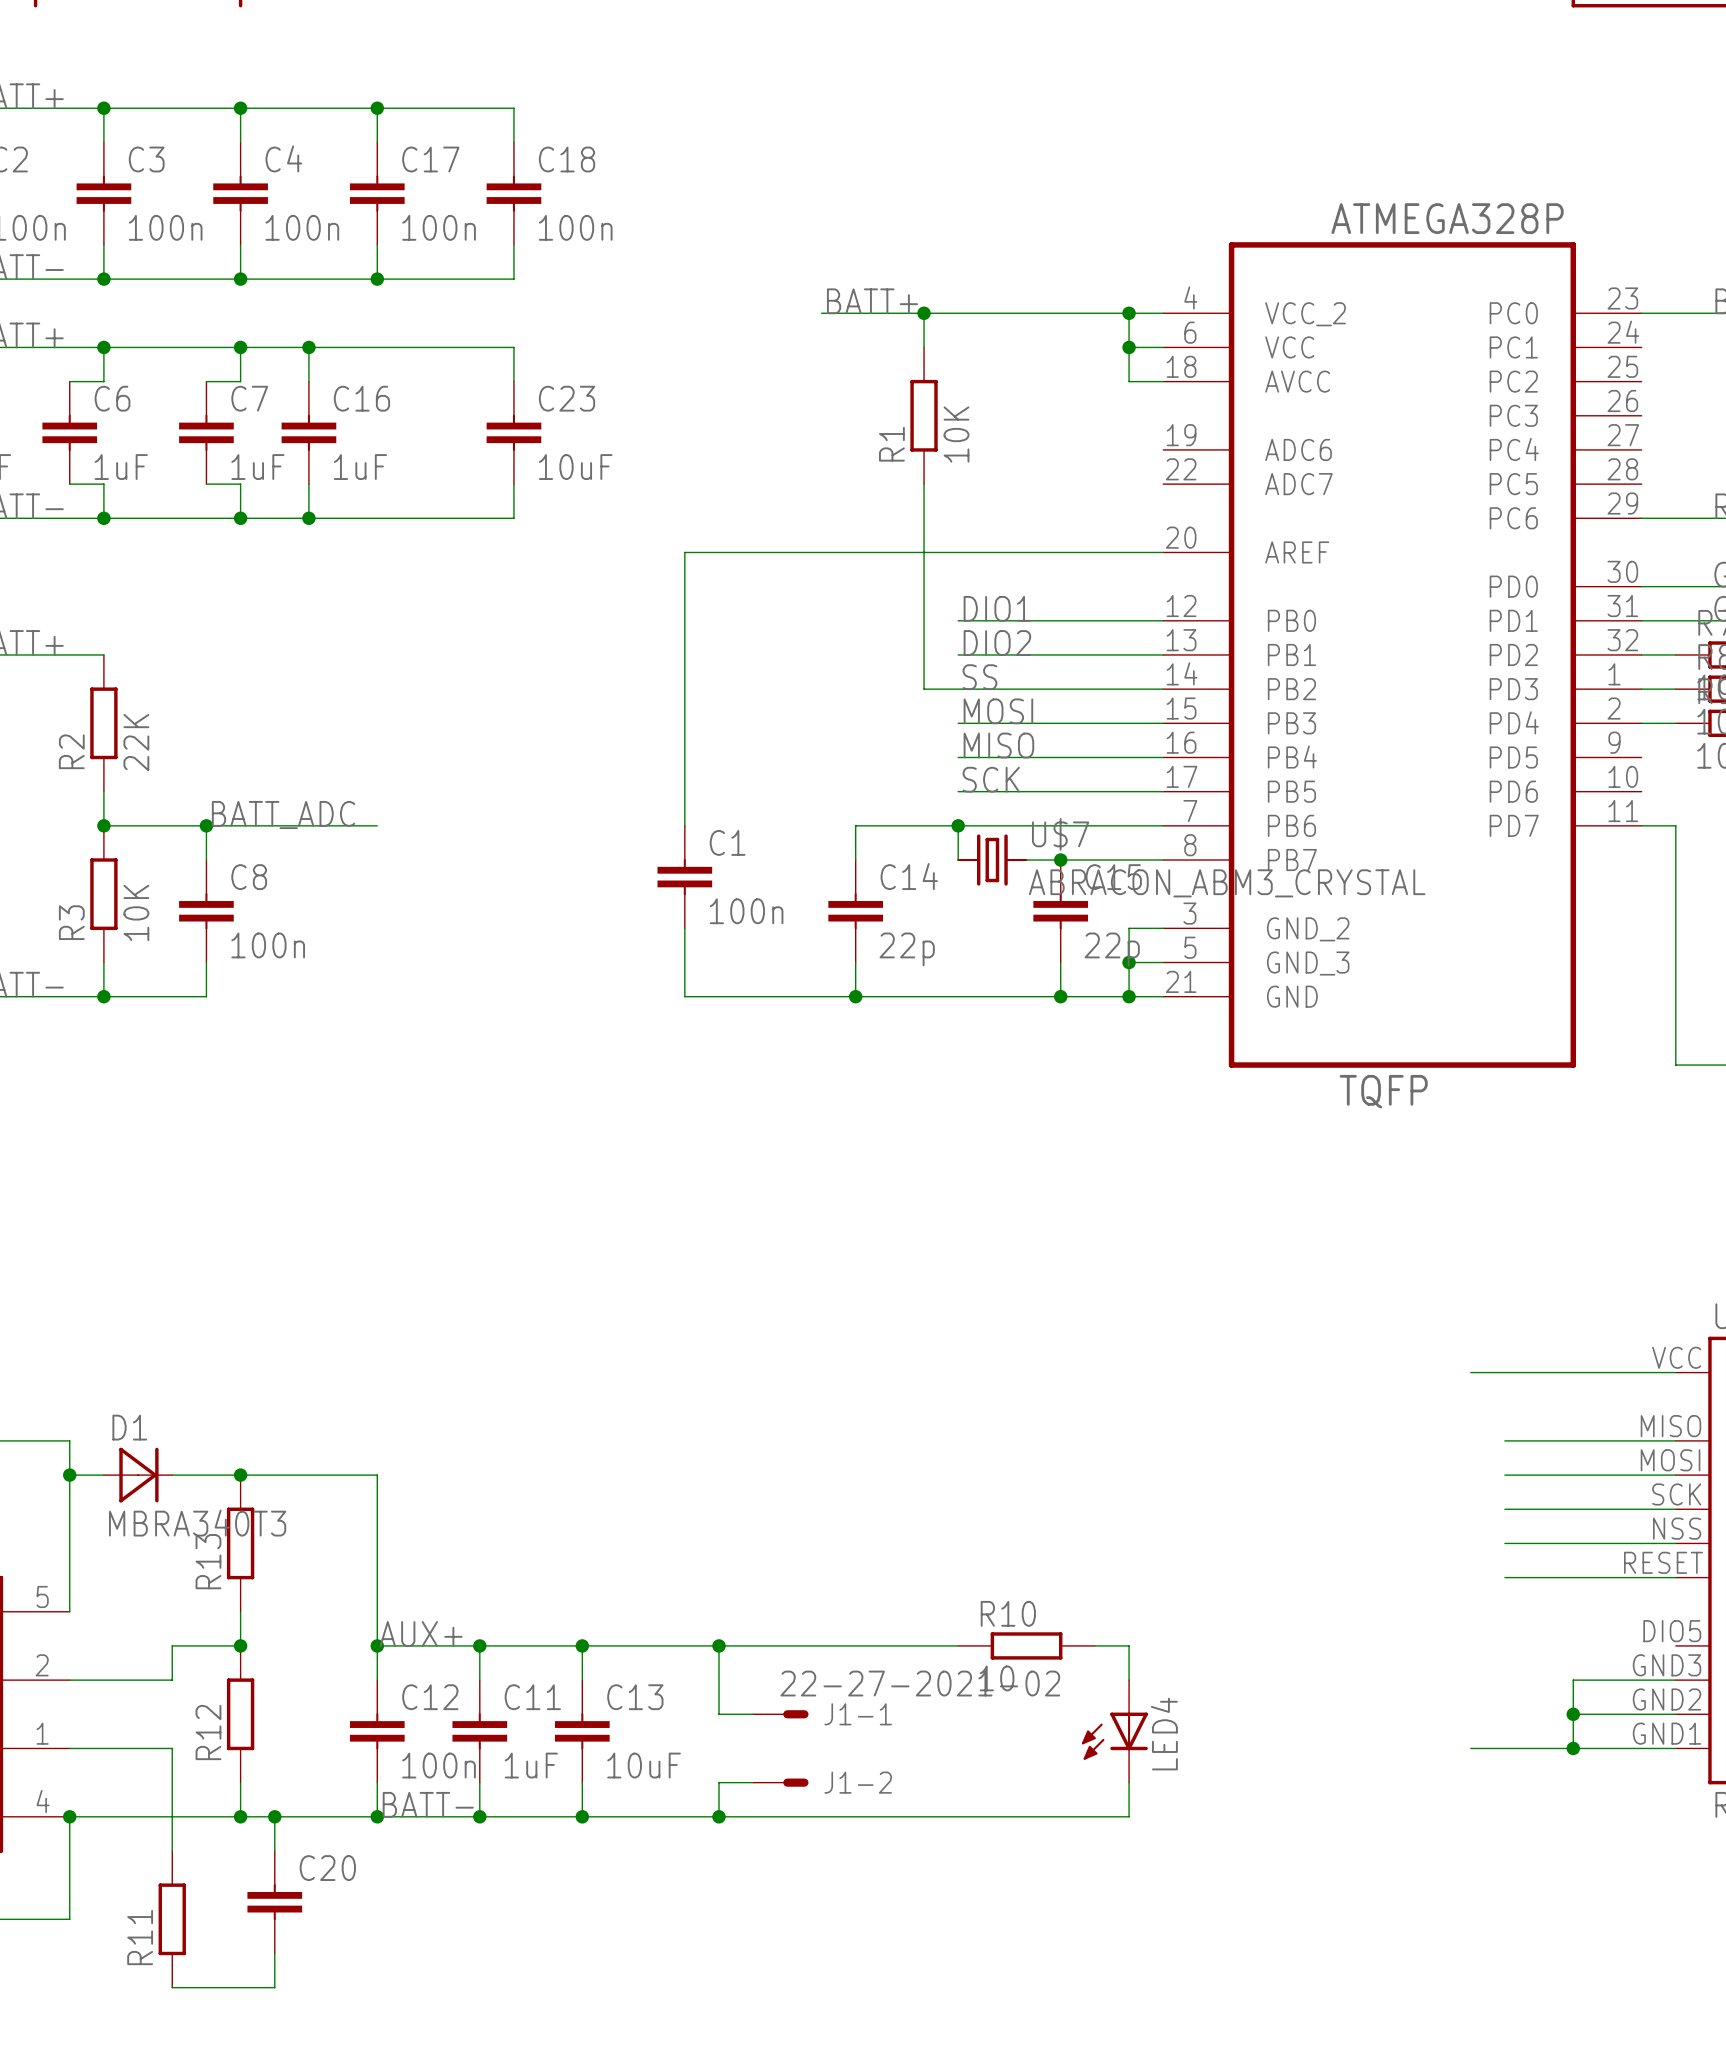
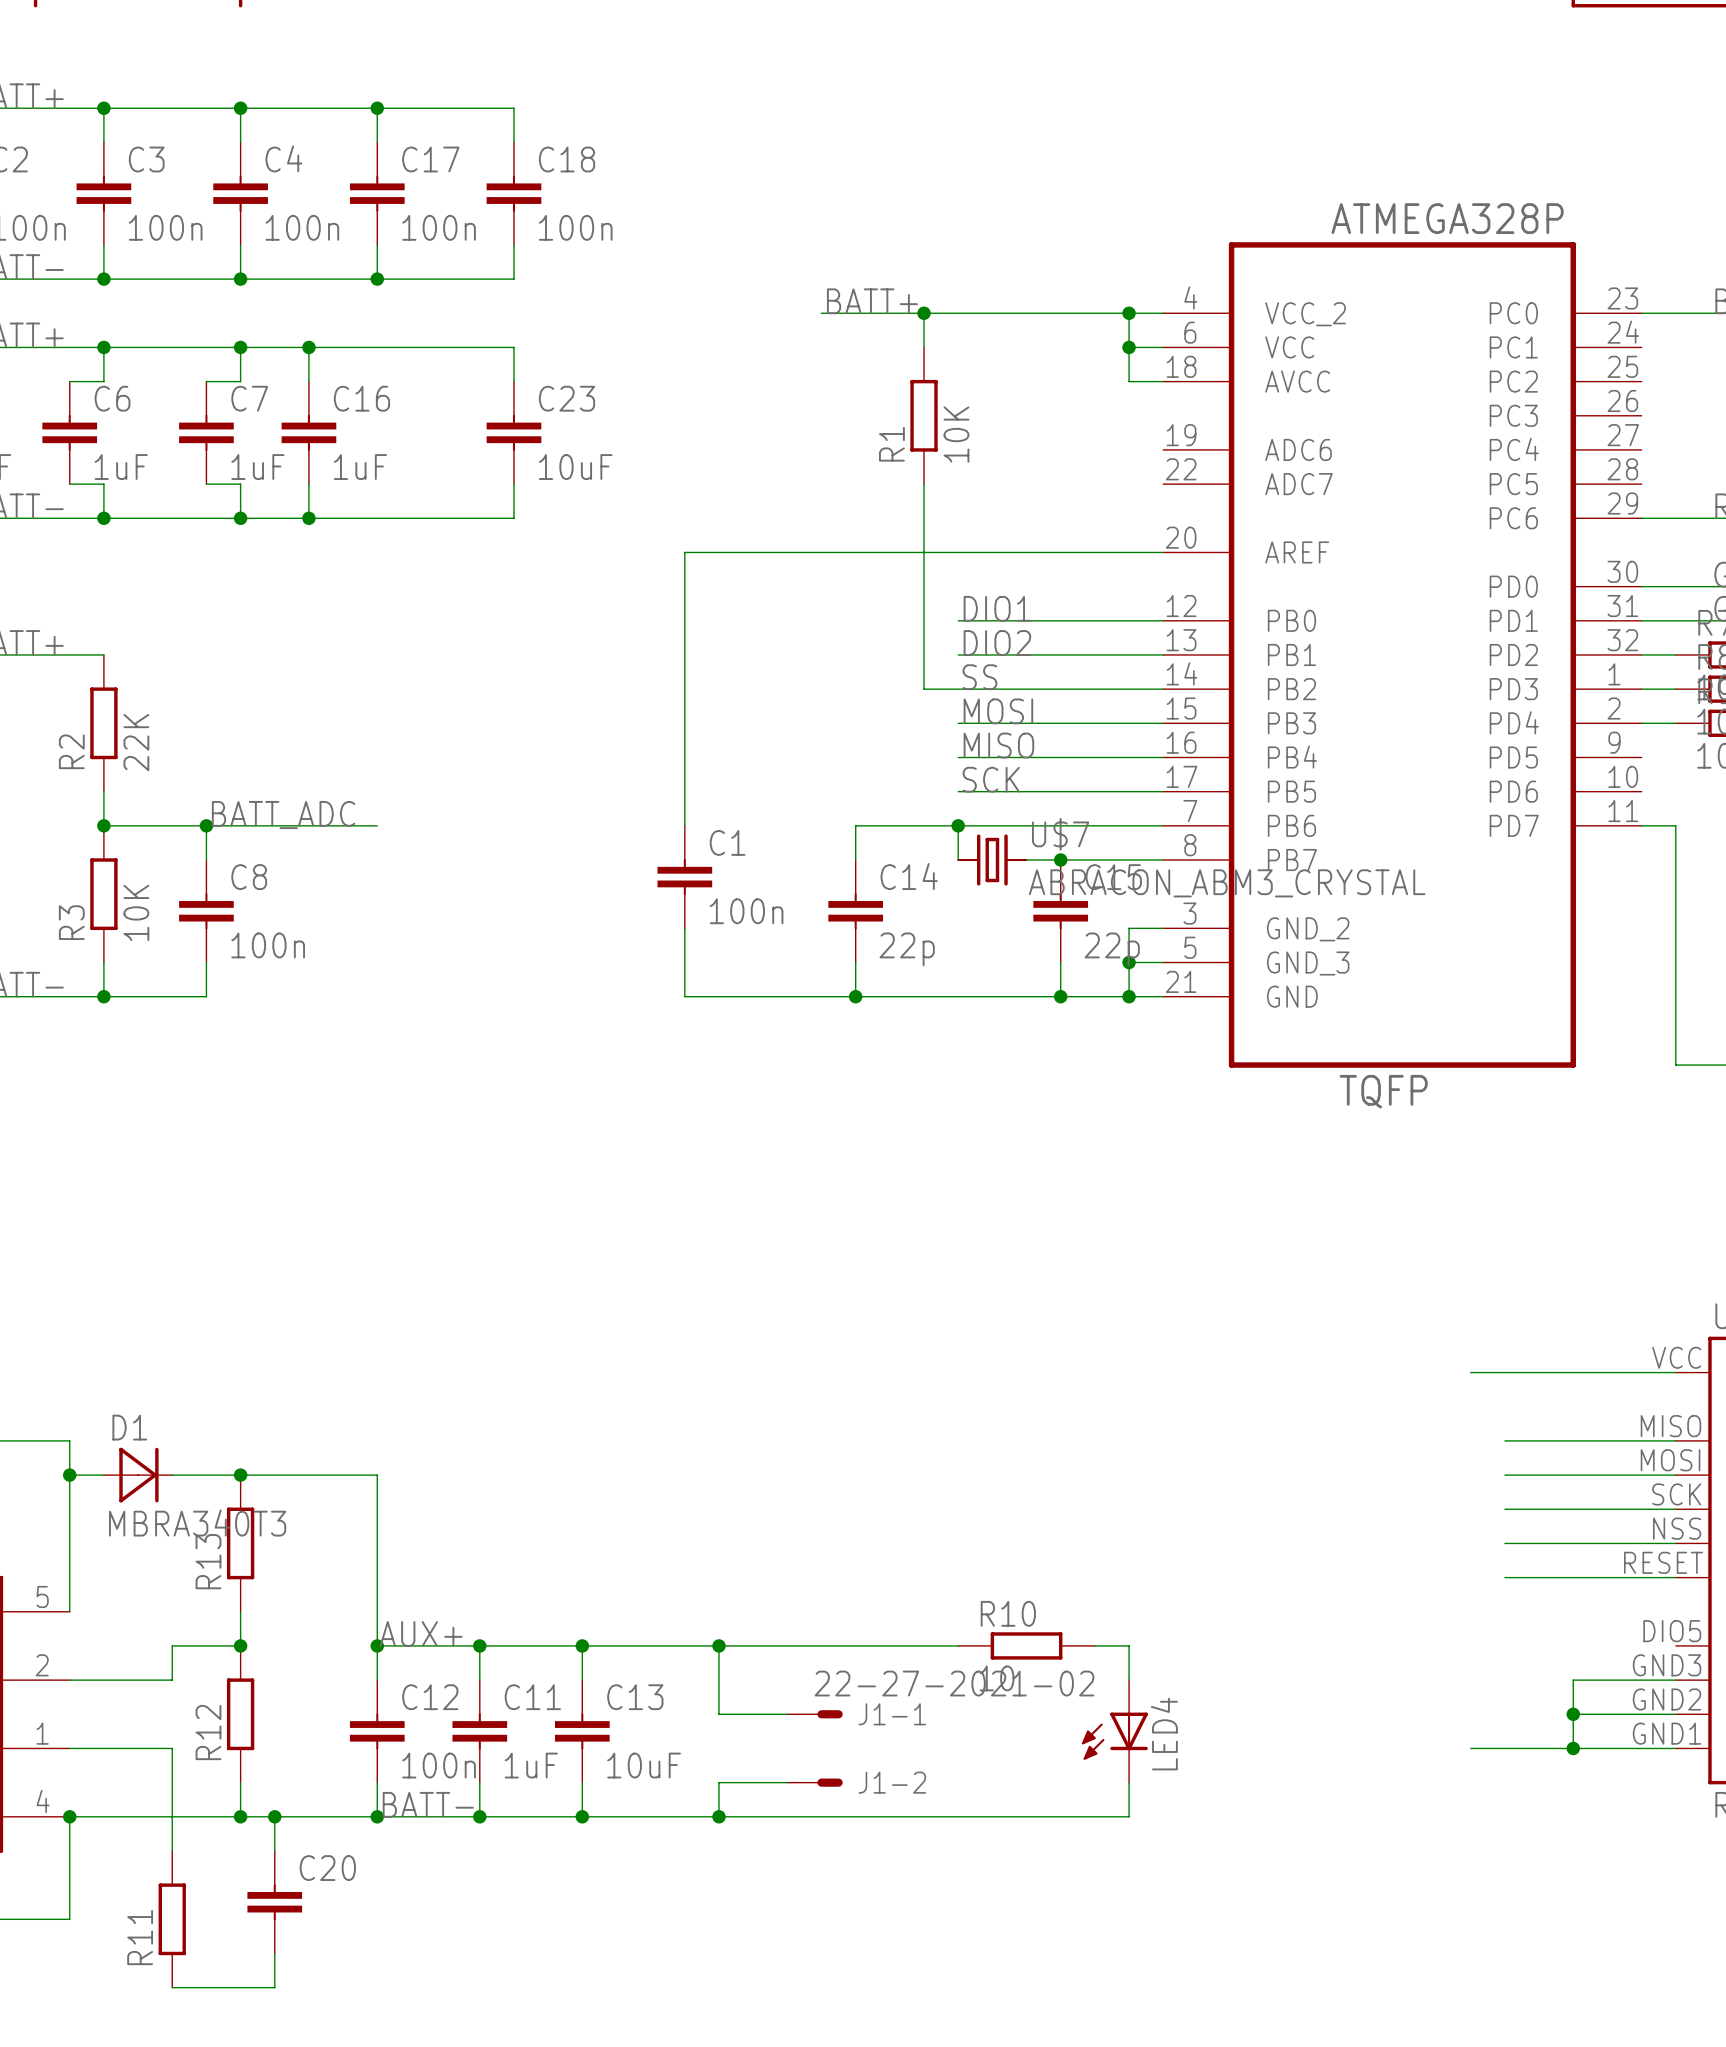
J1-1 position: (780, 1714) -> (815, 1714)
J1-2 position: (780, 1782) -> (815, 1782)

